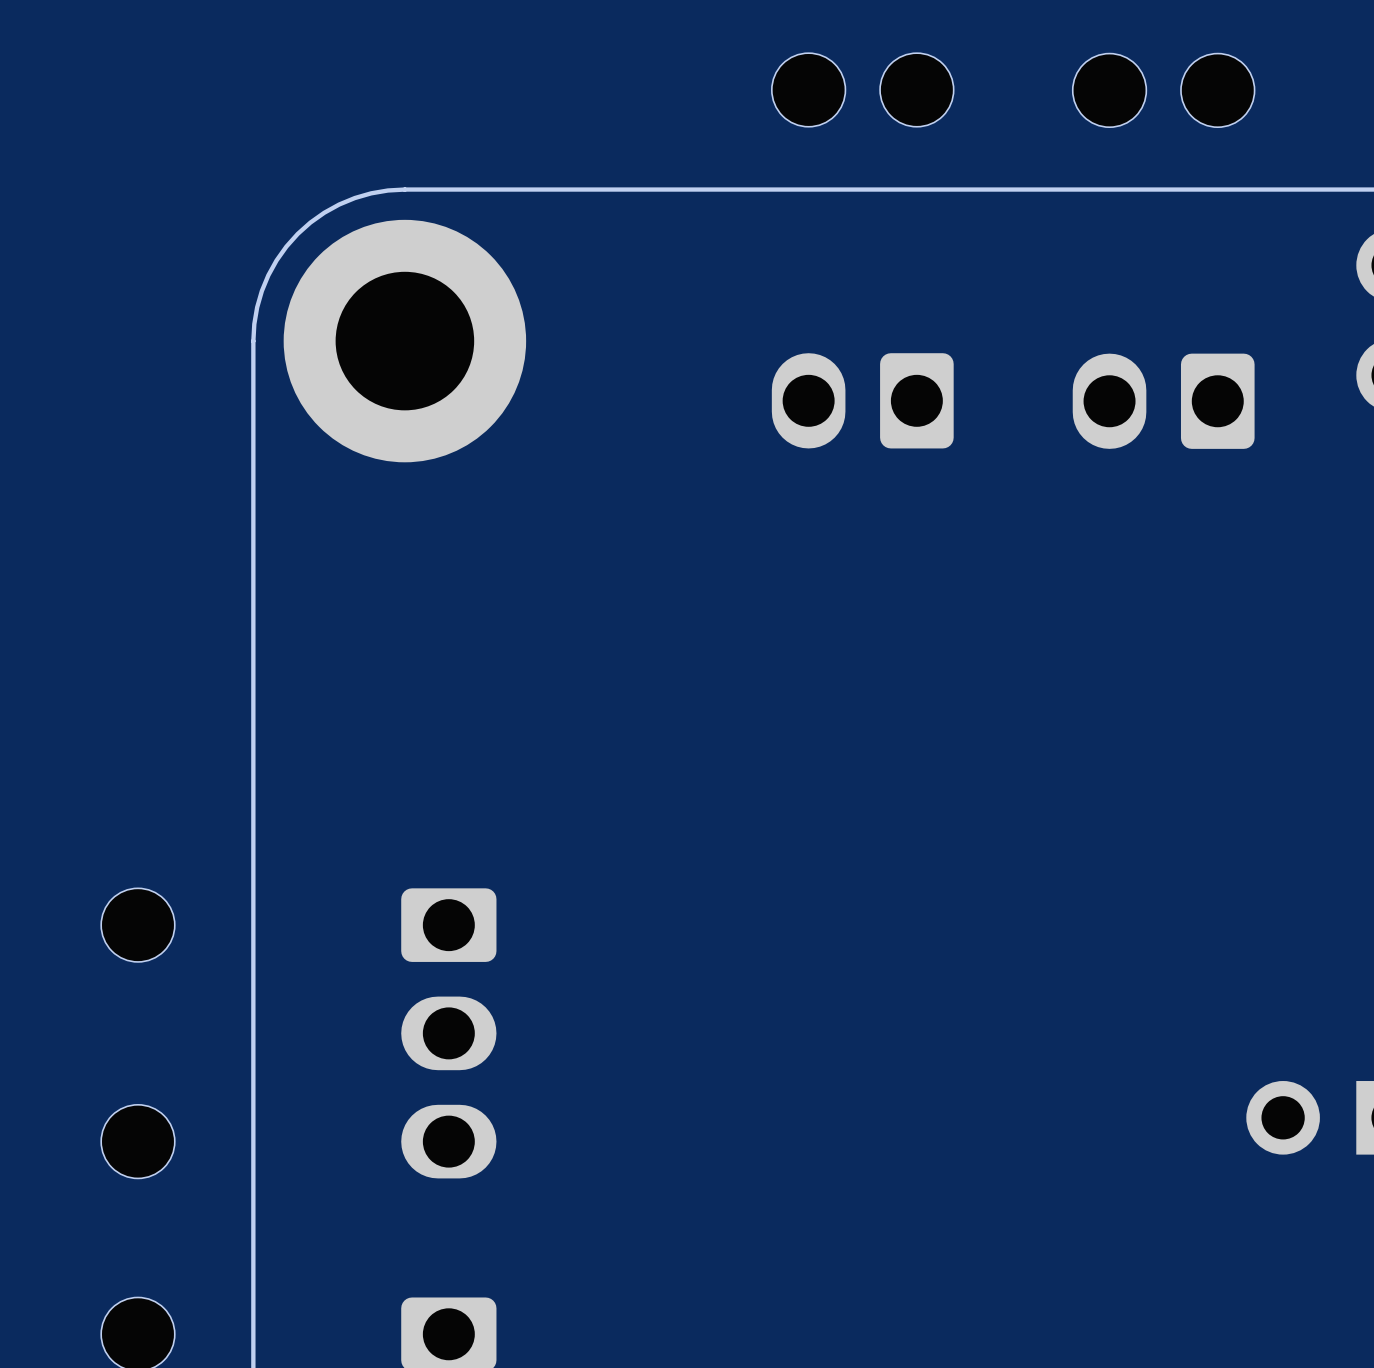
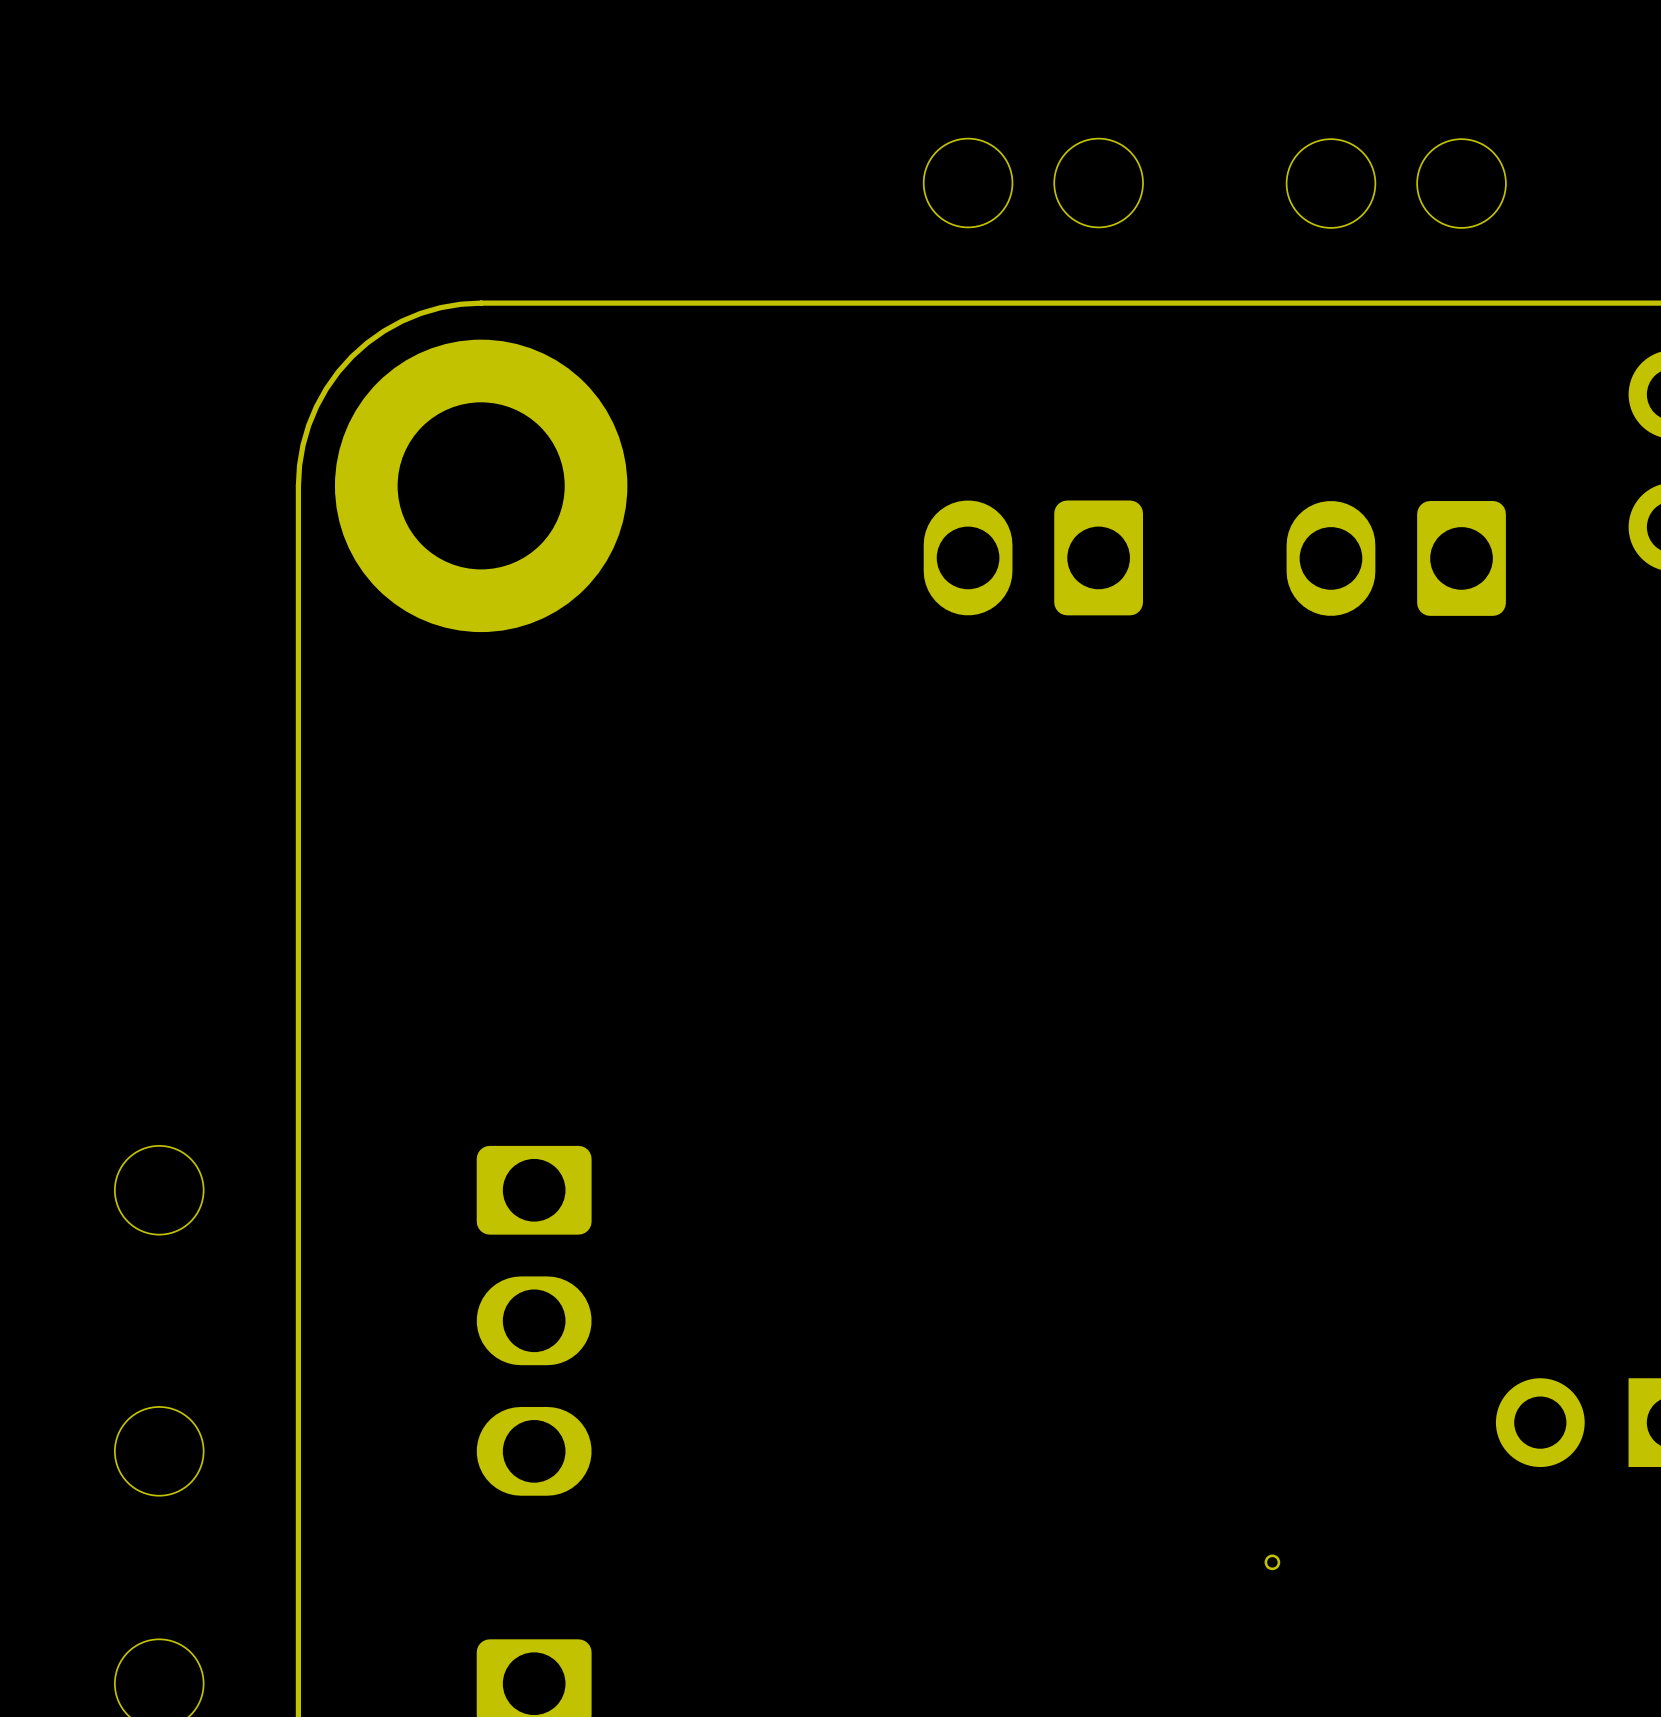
part: none -> (1272, 1562)

